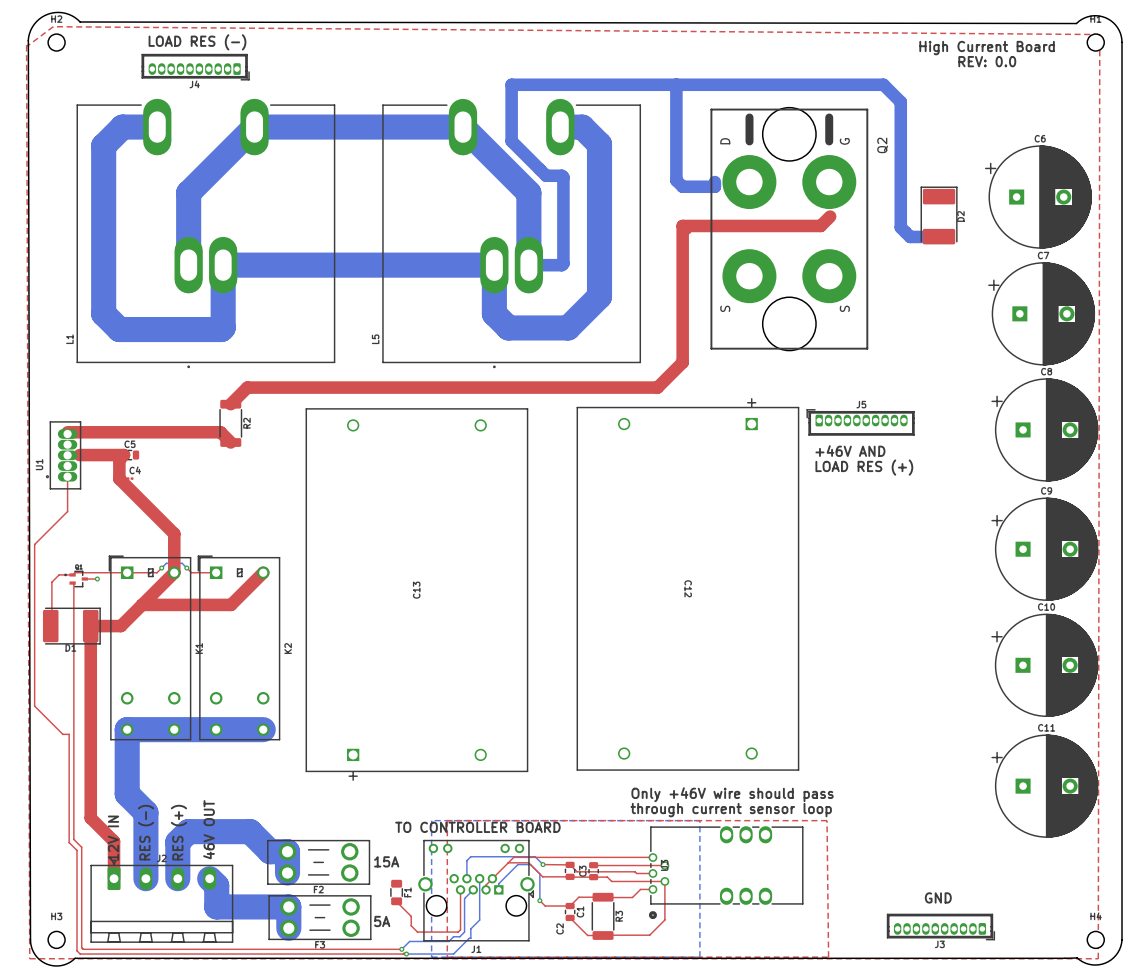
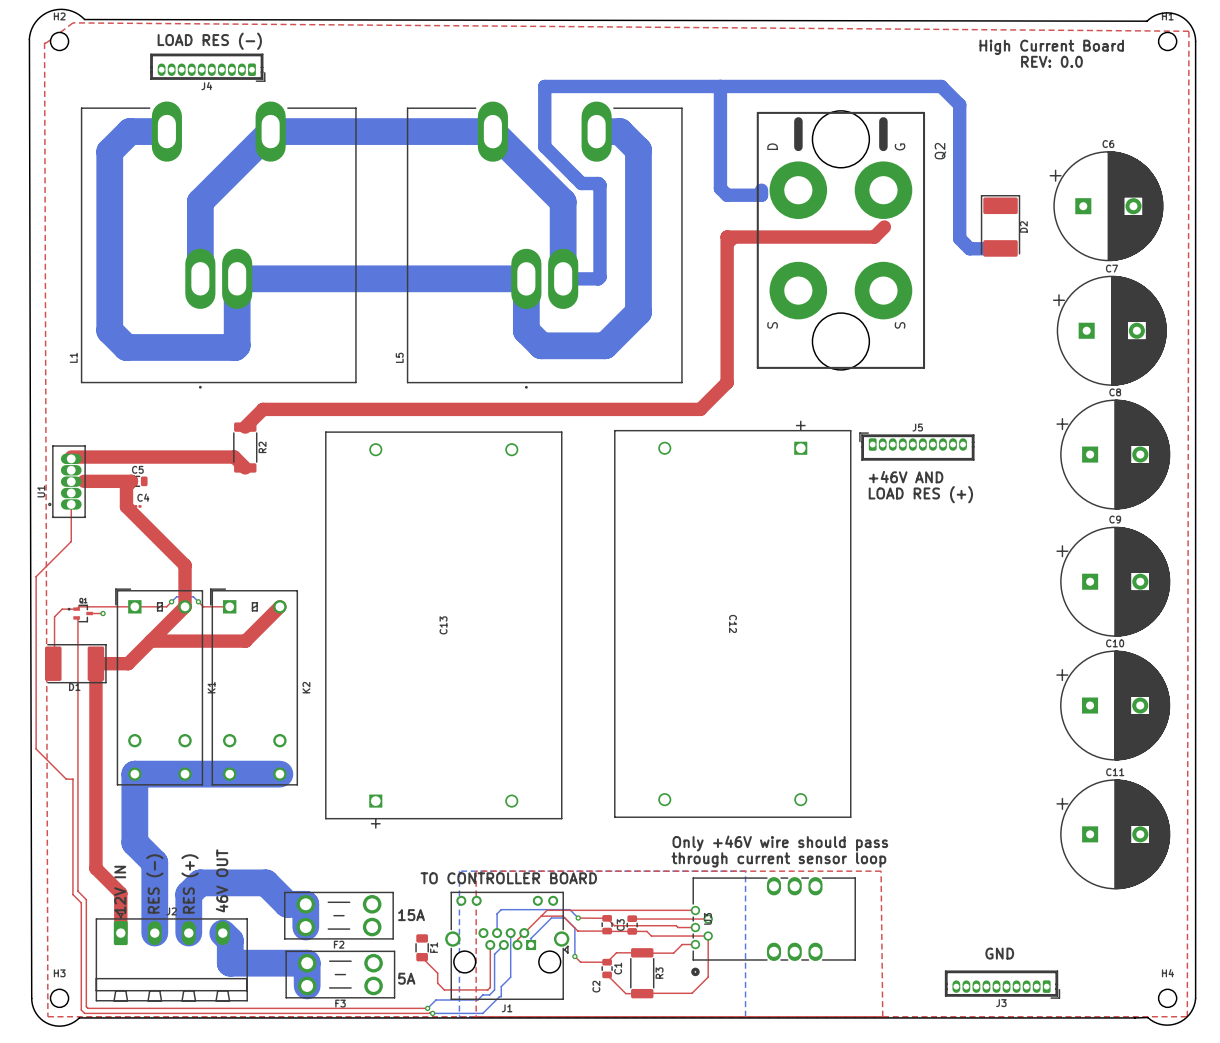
top zone outline: (53, 26) (1099, 34) (1098, 958) (29, 958) (26, 45) (53, 26) -> none
top zone outline: none -> (476, 1016) (47, 1016) (44, 42) (73, 22) (1188, 31) (1187, 1016) (882, 1016)

